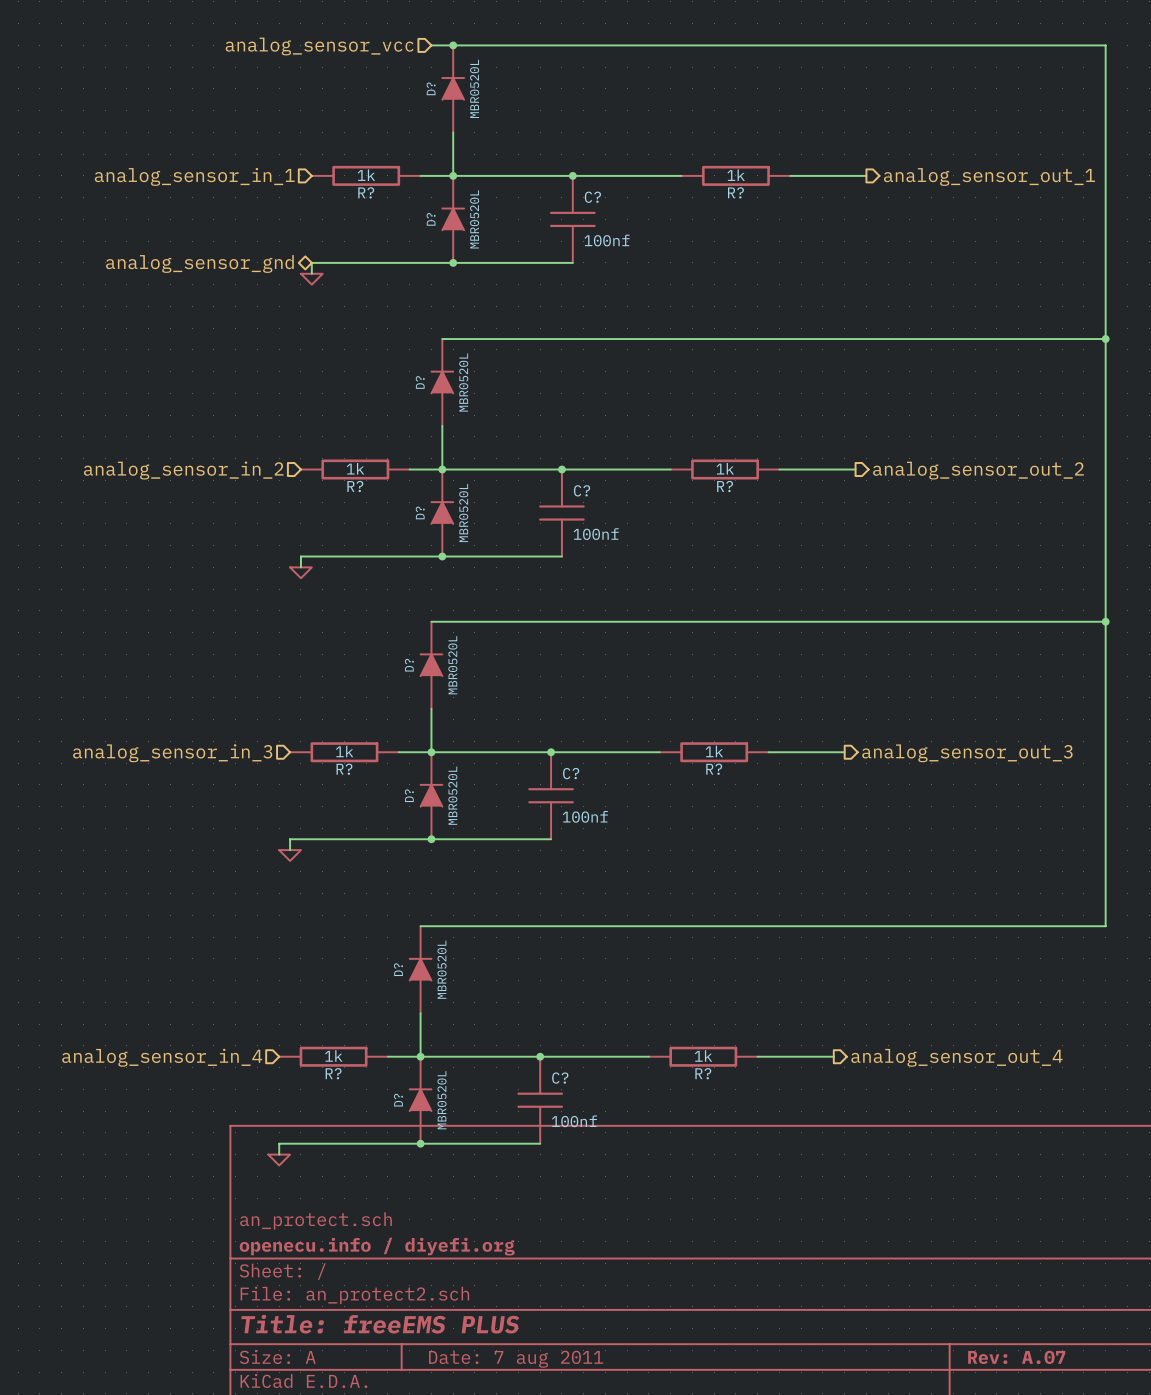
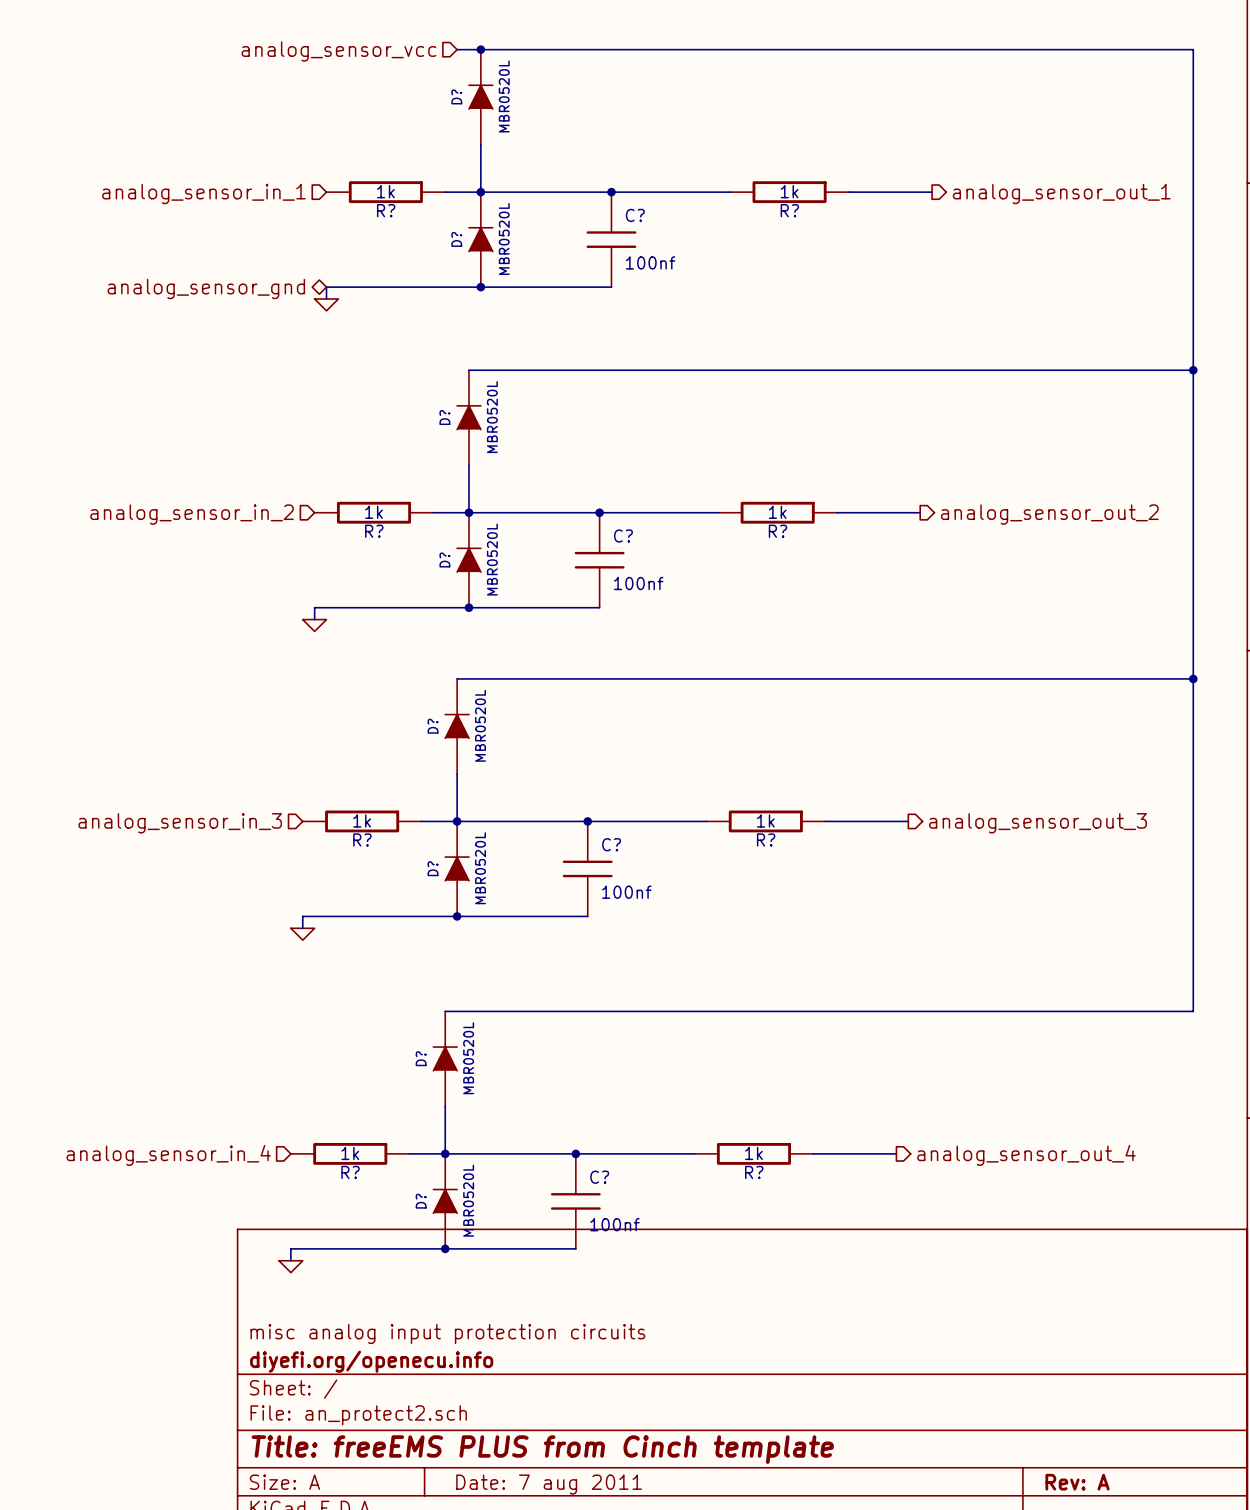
title block: an_protect.sch (316, 1220) -> misc analog input protection circuits (447, 1334)
title block: openecu.info / diyefi.org (377, 1246) -> diyefi.org/openecu.info (371, 1361)
title block: Title: freeEMS PLUS (380, 1324) -> Title: freeEMS PLUS from Cinch template (542, 1449)
title block: Rev: A.07 (1016, 1357) -> Rev: A (1077, 1482)

